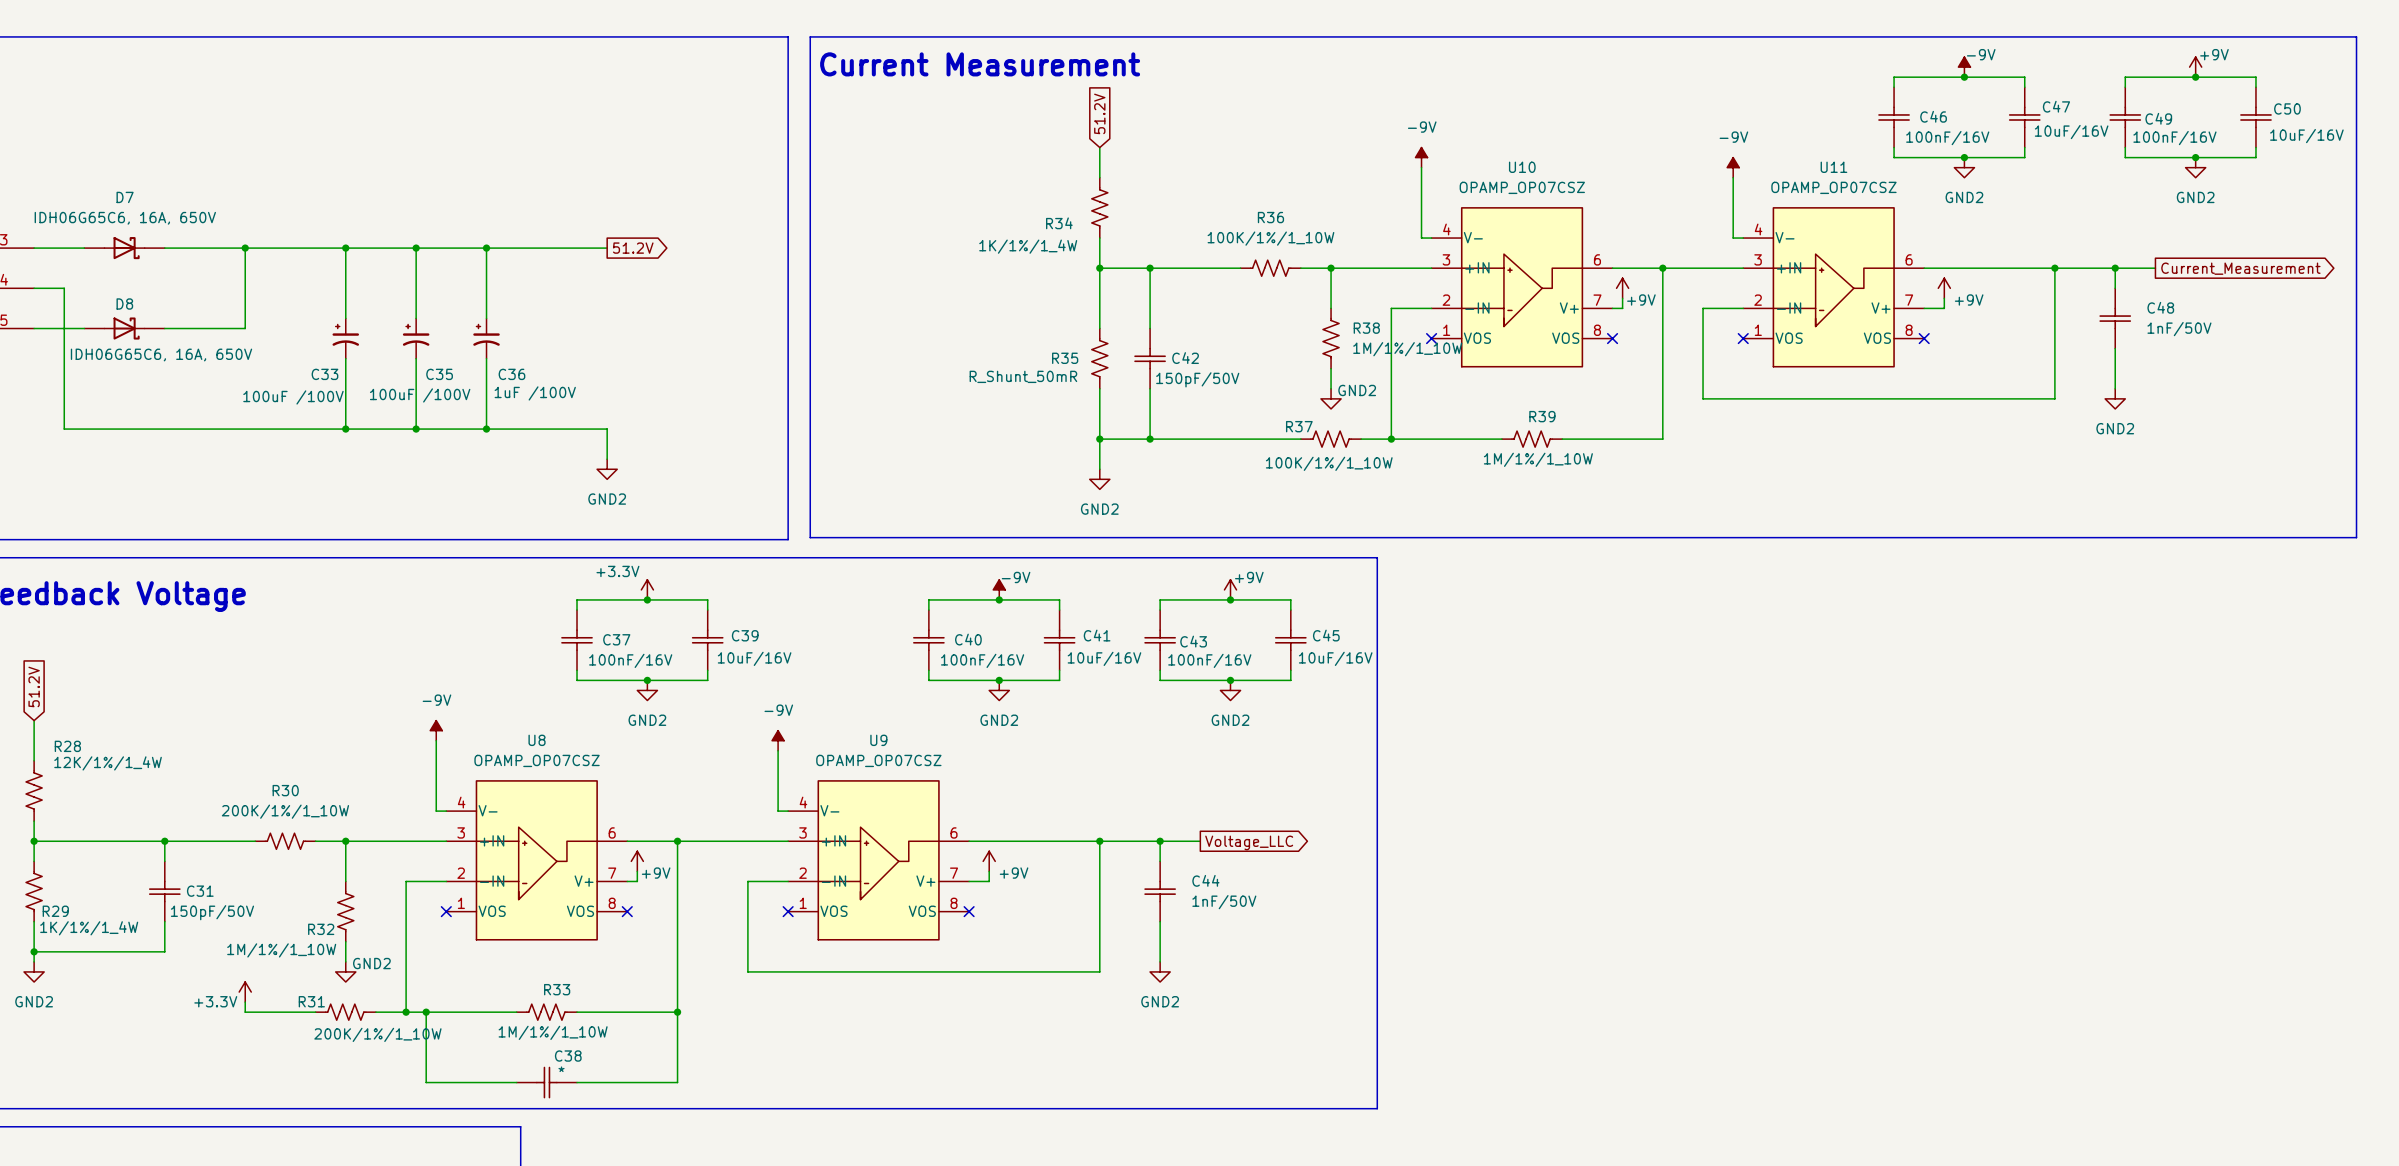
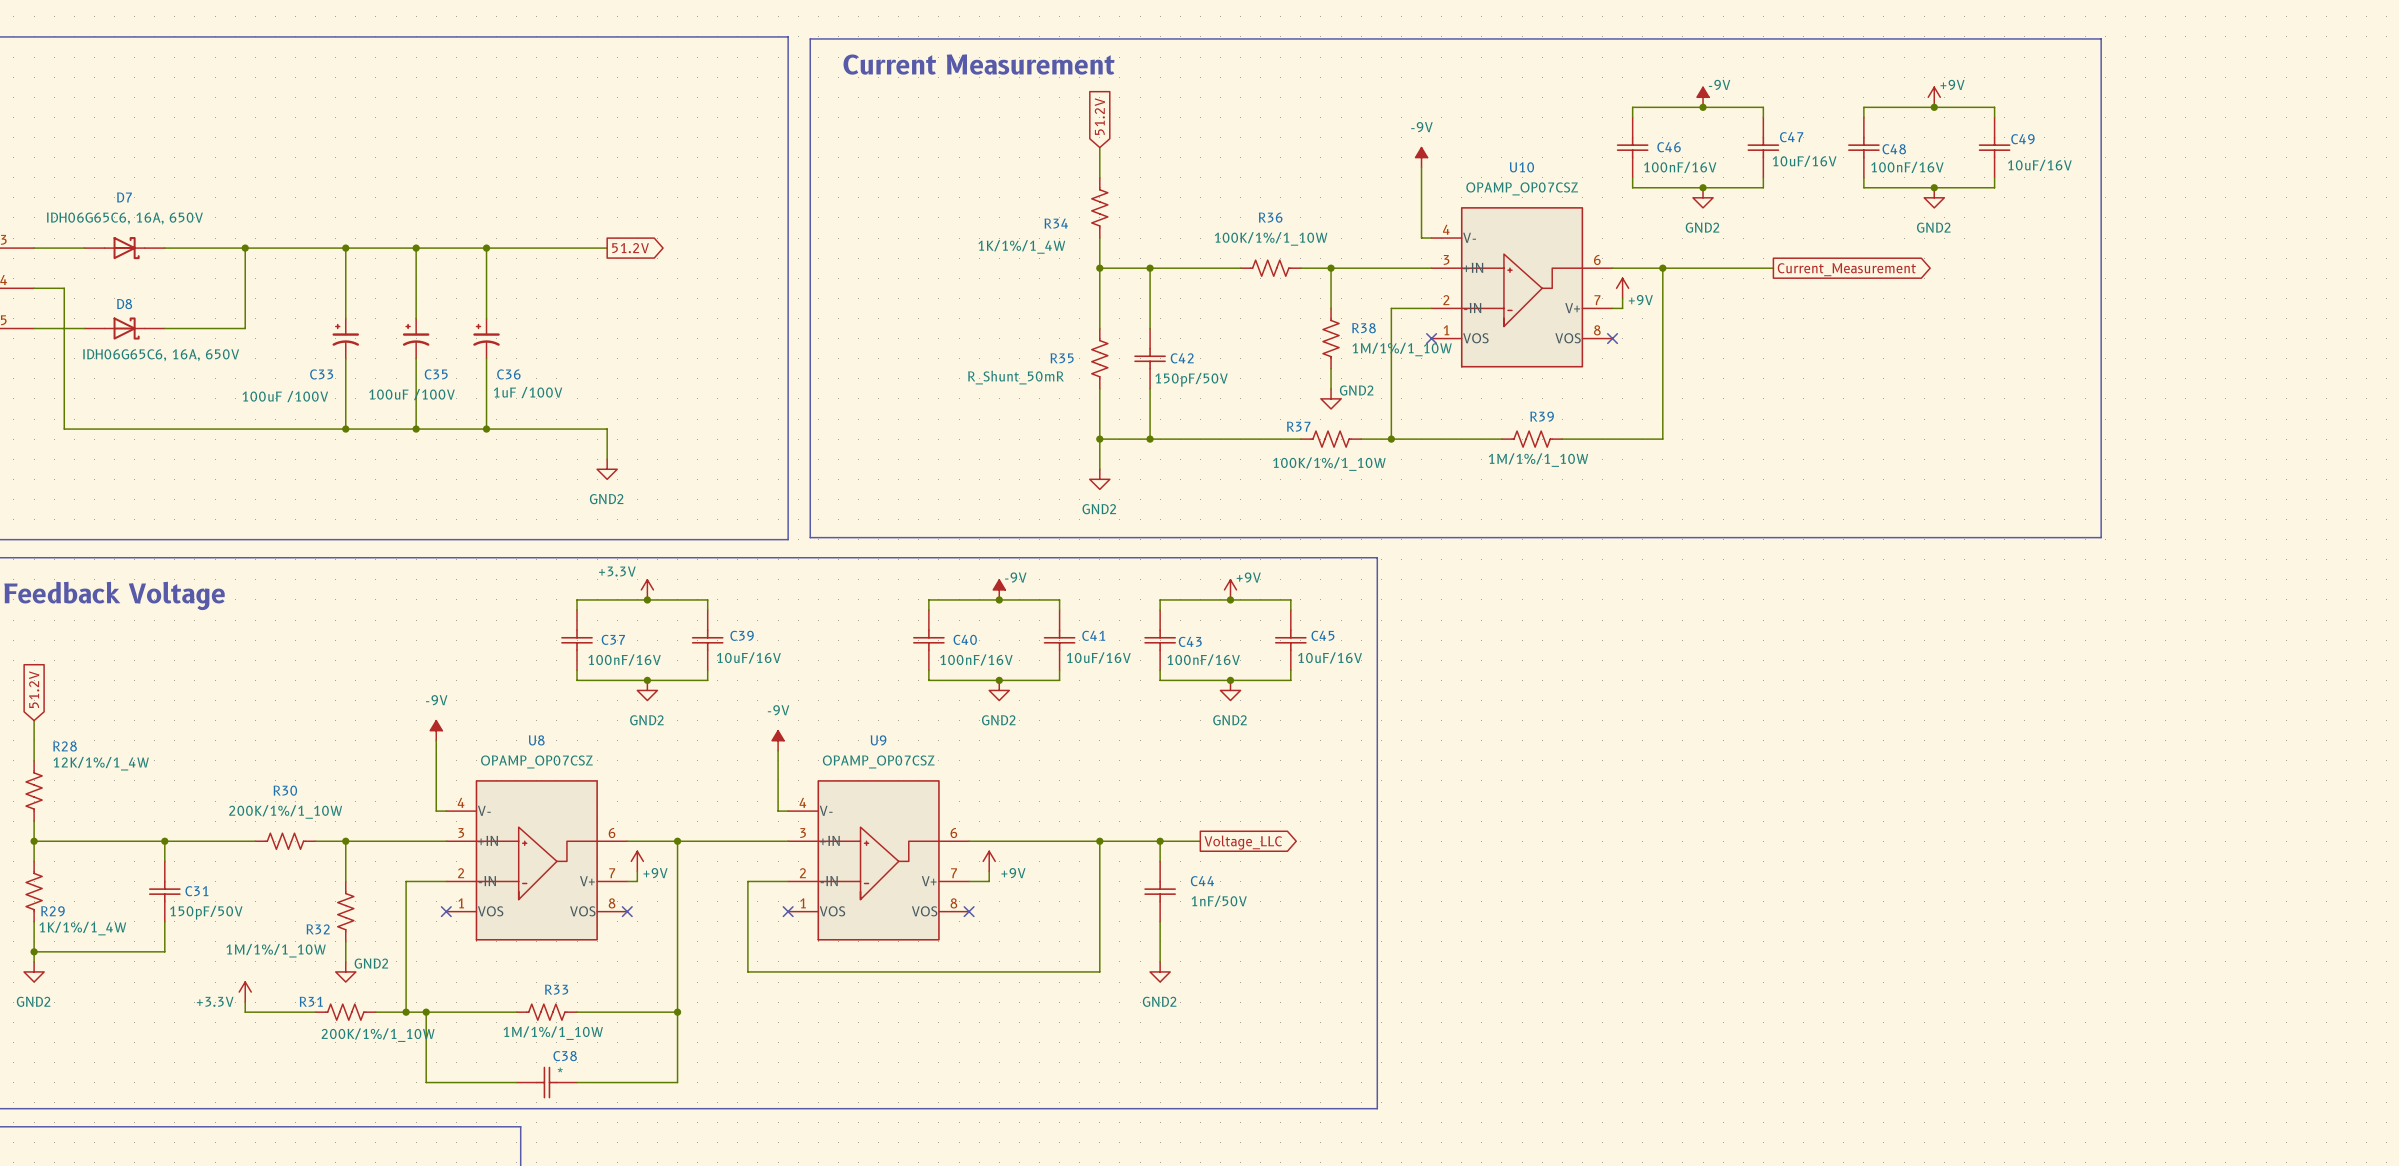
line: (810, 38) (810, 36) (2356, 36) (2356, 537) (2101, 537) -> (810, 38) (2101, 38) (2101, 537)
power symbol: -9V (1964, 67) -> none
power symbol: +9V (2195, 67) -> none
junction: (1964, 77) -> none
junction: (2195, 77) -> none
wire: (1894, 87) (1894, 77) (2024, 77) (2024, 87) -> (1863, 117) (1863, 107) (1994, 107) (1994, 117)
wire: (2125, 87) (2125, 77) (2255, 77) (2255, 87) -> none
power symbol: none -> +9V (1934, 97)
junction: none -> (1703, 107)
junction: none -> (1934, 107)
wire: none -> (1632, 117) (1632, 107) (1763, 107) (1763, 117)
C46 position: (1894, 117) -> (1632, 147)
C47 position: (2024, 117) -> (1763, 147)
C49 position: (2125, 117) -> (1994, 147)
C50: 10uF/16V (2255, 117) -> none
C49 name position: C49 (2158, 118) -> C49 (2022, 139)
power symbol text position: -9V (1733, 137) -> -9V (1719, 84)
C49 value: 100nF/16V (2174, 138) -> 10uF/16V (2039, 165)
wire: (1894, 147) (1894, 157) (2024, 157) (2024, 147) -> (1863, 177) (1863, 187) (1994, 187) (1994, 177)
wire: (2125, 147) (2125, 157) (2255, 157) (2255, 147) -> none
junction: (1964, 157) -> none
junction: (2195, 157) -> none
power symbol position: -9V (1733, 167) -> -9V (1703, 97)
power symbol position: GND2 (1964, 167) -> GND2 (1934, 197)
power symbol: GND2 (2195, 167) -> none
wire: none -> (1632, 177) (1632, 187) (1763, 187) (1763, 177)
wire: (1733, 177) (1733, 238) (1743, 238) -> none
junction: none -> (1703, 187)
junction: none -> (1934, 187)
power symbol: none -> GND2 (1703, 197)
global label: none -> Current_Measurement (1846, 269)
wire: (1924, 268) (2155, 268) -> none
wire: (2054, 268) (2054, 398) (1703, 398) (1703, 308) (1743, 308) -> none
junction: (2054, 268) -> none
wire: (2115, 268) (2115, 288) -> none
junction: (2115, 268) -> none
global label: Current_Measurement (2240, 268) -> none
U11: OPAMP_OP07CSZ (1833, 287) -> none
power symbol: +9V (1944, 288) -> none
wire: (1944, 298) (1944, 308) (1924, 308) -> none
C48 name position: C48 (2160, 307) -> C48 (1894, 149)
C48 position: (2115, 318) -> (1863, 147)
C48 value: 1nF/50V (2179, 329) -> 100nF/16V (1907, 167)
no-connect mark: (1743, 338) -> none
no-connect mark: (1924, 338) -> none
wire: (2115, 348) (2115, 388) -> none
power symbol: GND2 (2115, 398) -> none

